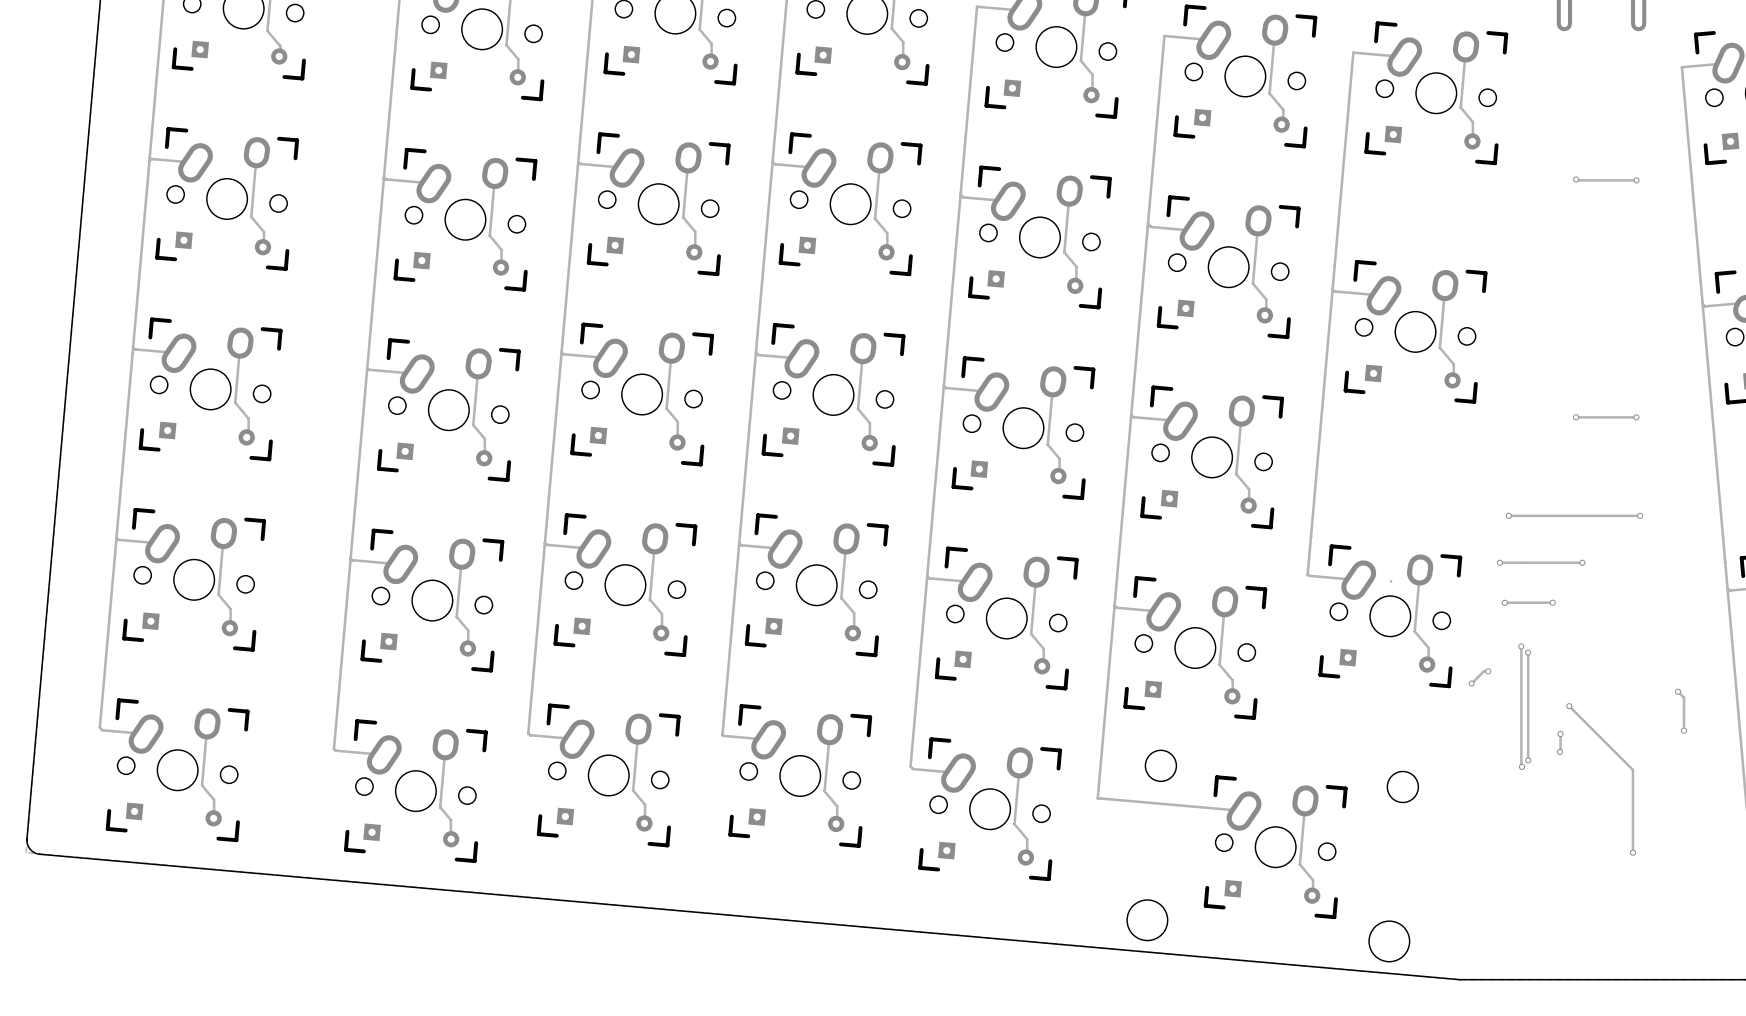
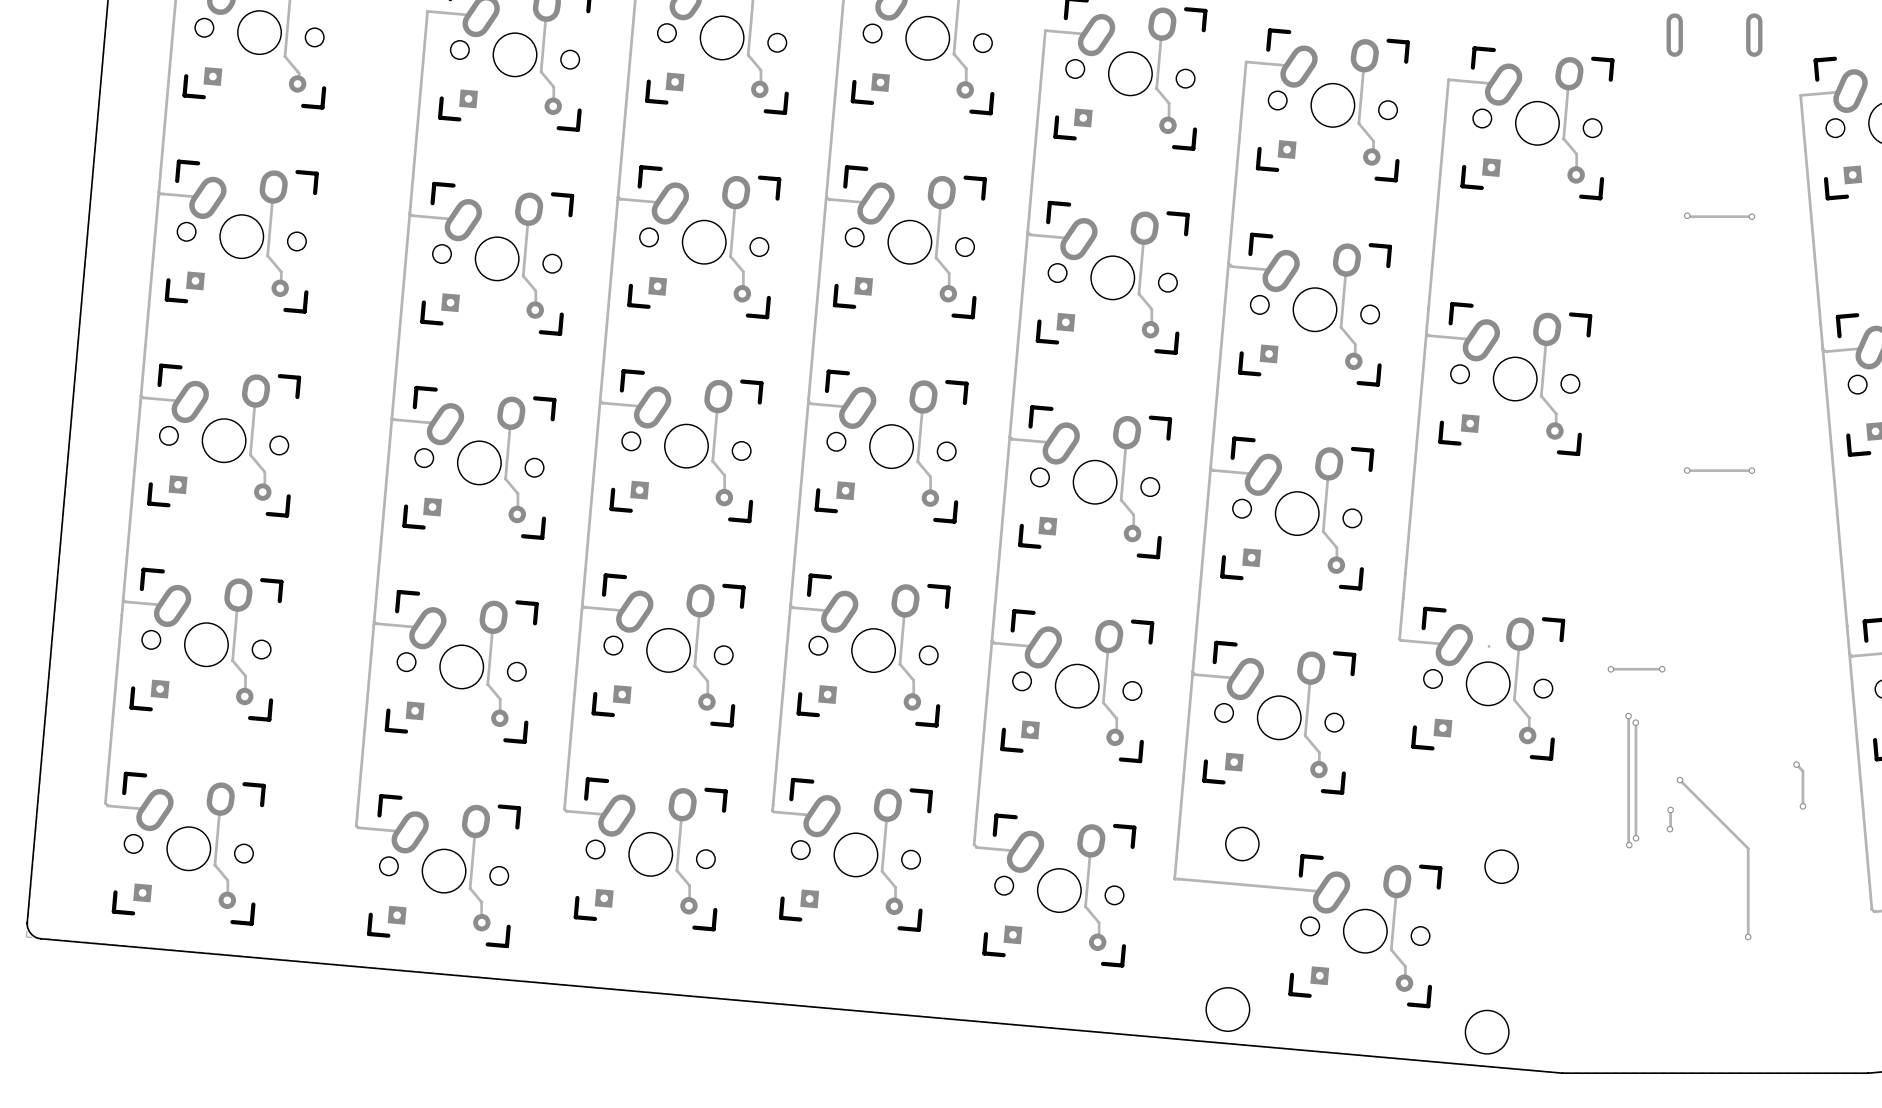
track: (1508, 515) (1640, 515) -> none
via: (1508, 515) -> none
via: (1640, 515) -> none
track: (1499, 562) (1582, 562) -> none
via: (1499, 562) -> none
via: (1582, 562) -> none
track: (1488, 671) (1483, 671) (1471, 683) -> none
via: (1488, 671) -> none
via: (1471, 683) -> none

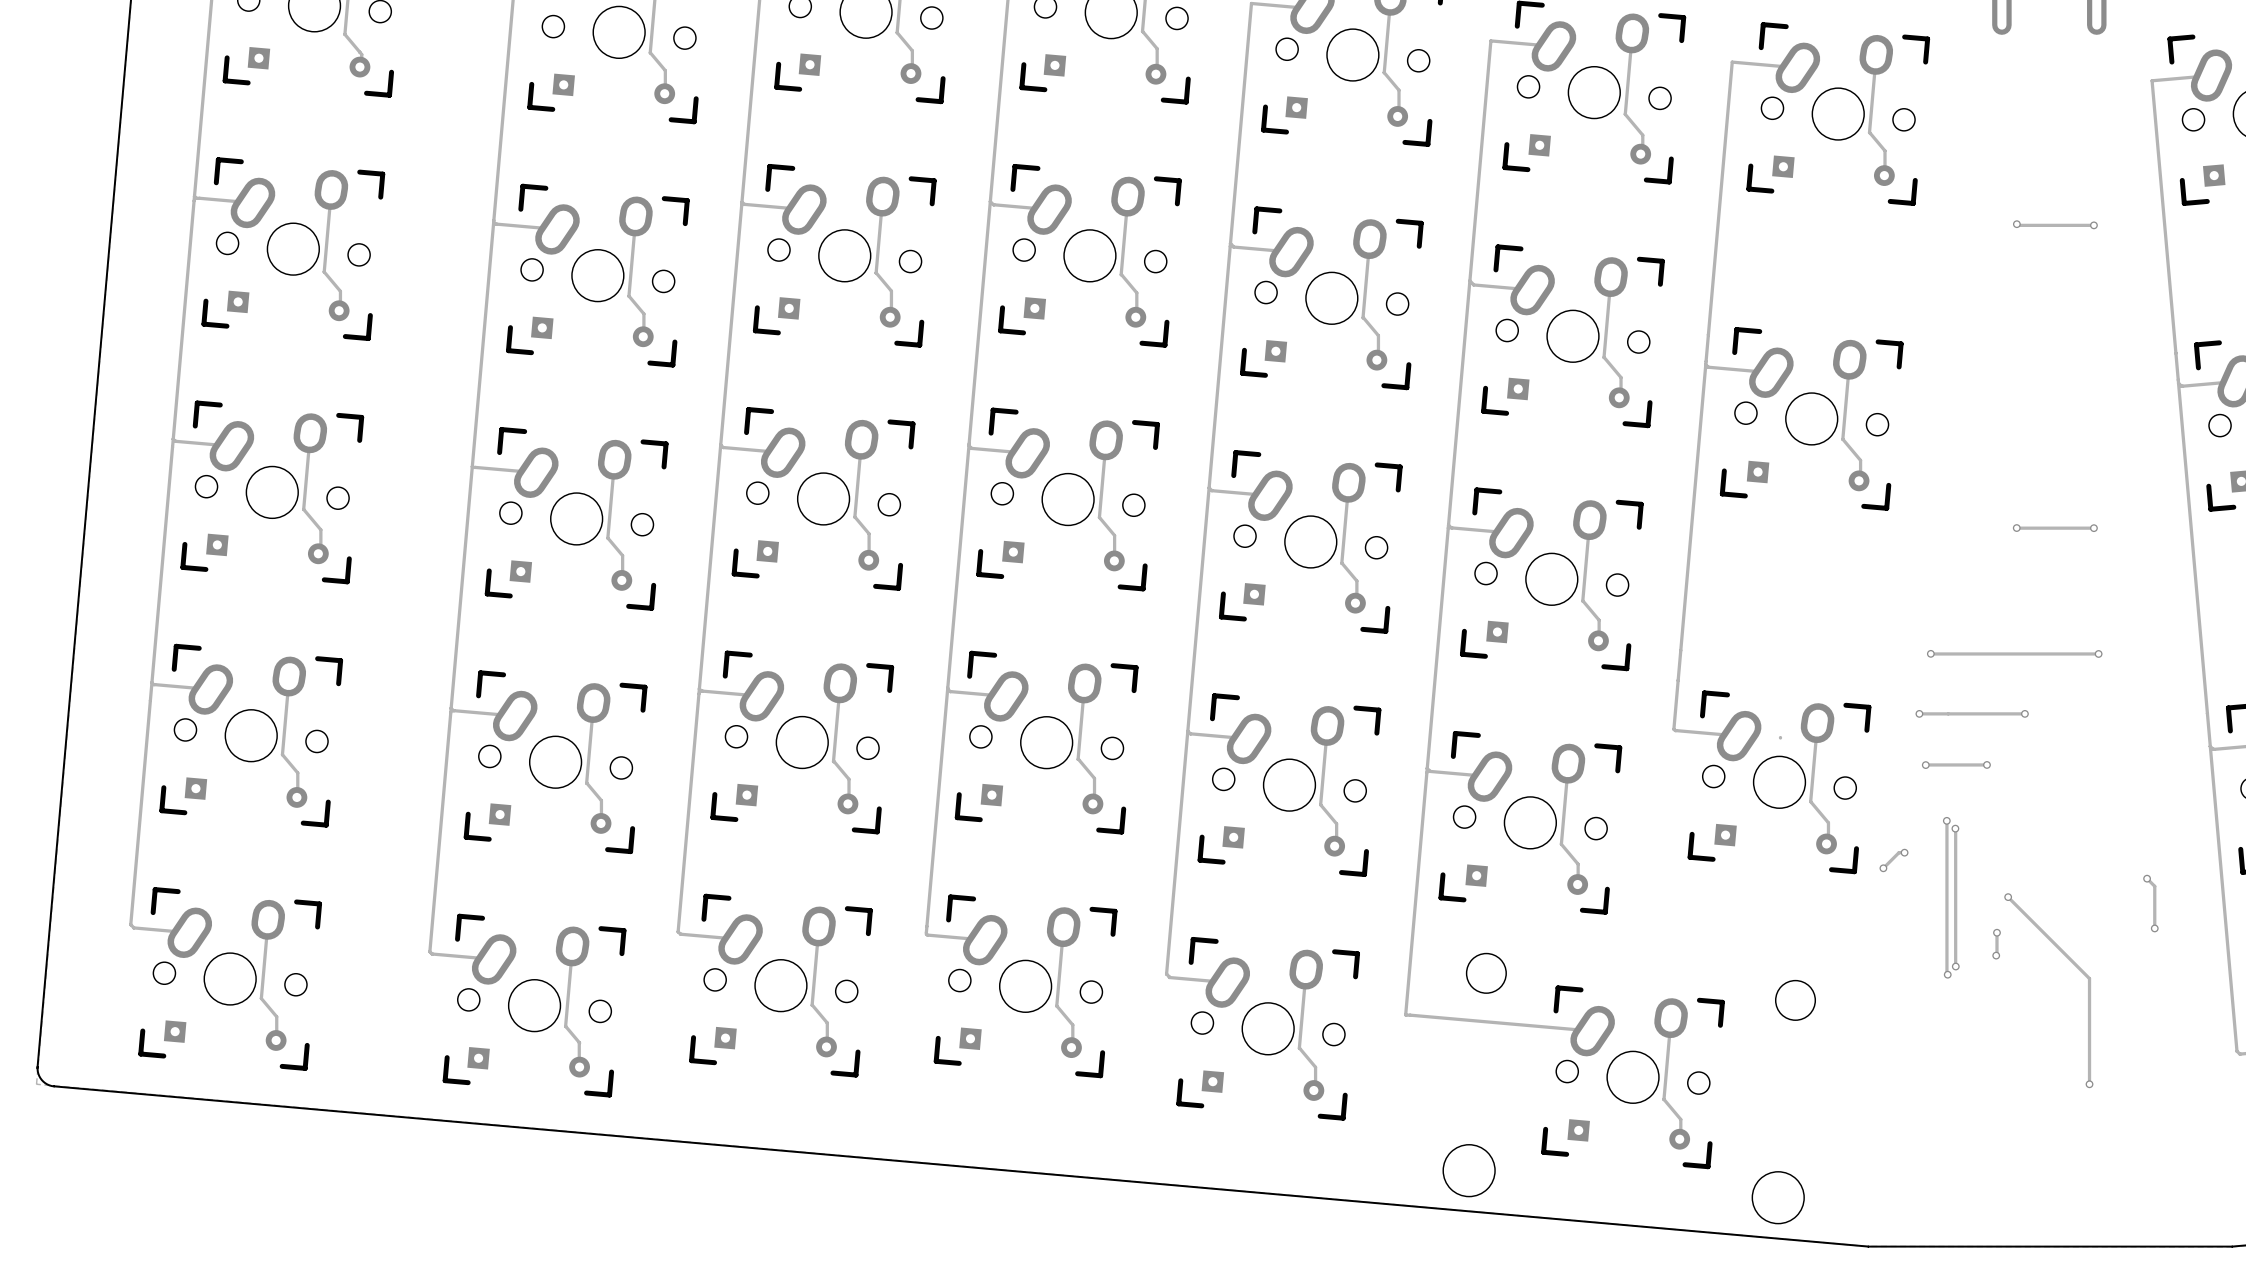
track: none -> (1930, 653) (2098, 653)
via: none -> (1930, 653)
via: none -> (2098, 653)
track: none -> (1919, 713) (2024, 713)
via: none -> (1919, 713)
via: none -> (2024, 713)
track: none -> (1904, 852) (1899, 852) (1883, 868)
via: none -> (1904, 852)
via: none -> (1883, 868)

